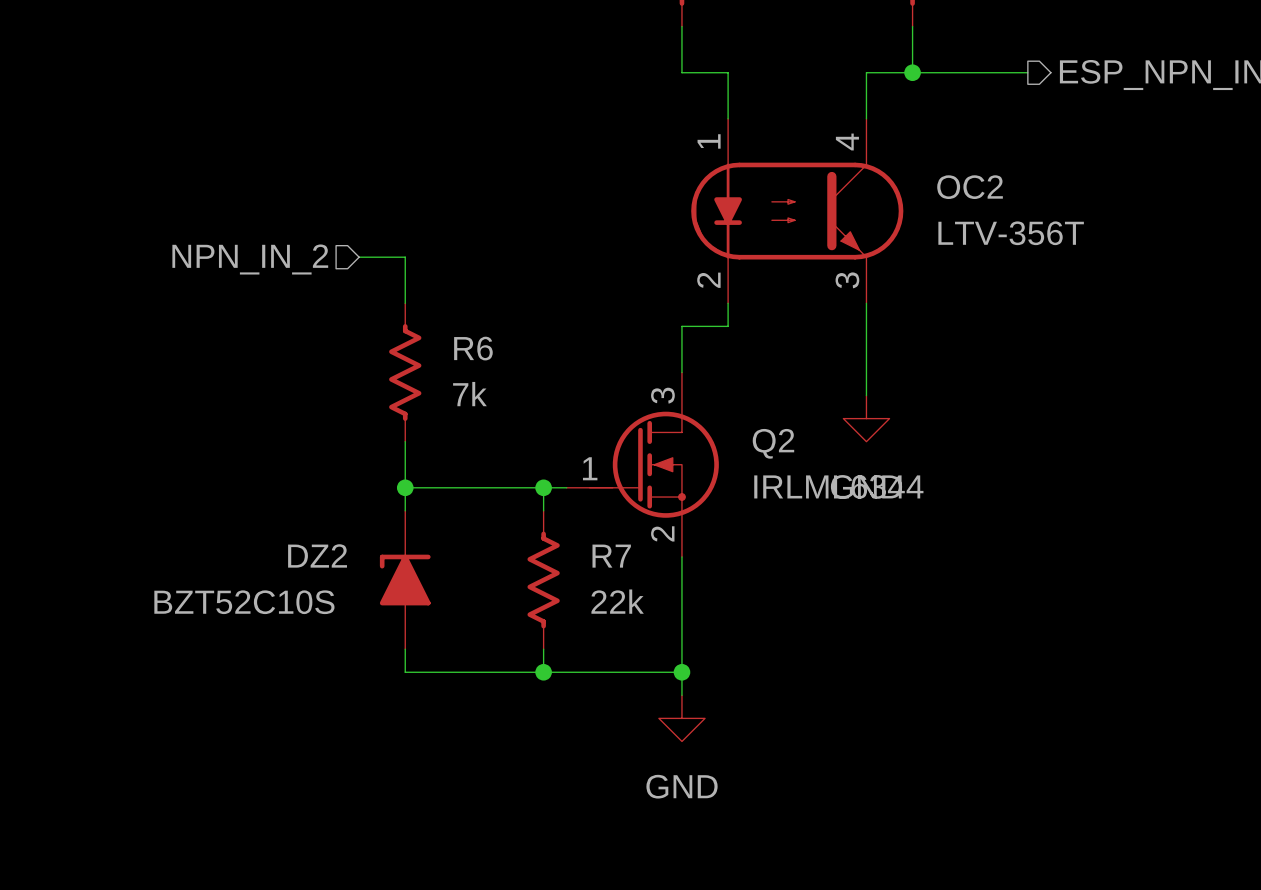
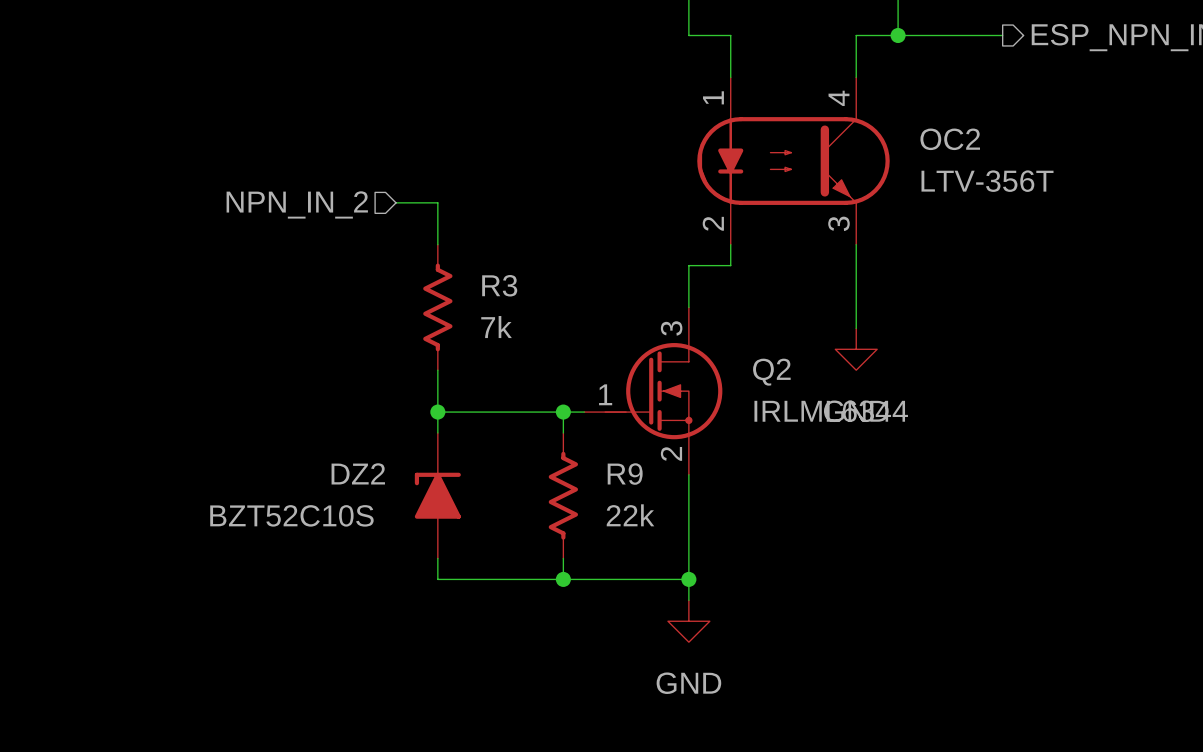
R6 name: R6 (473, 348) -> R3 (499, 285)
R7 name: R7 (611, 556) -> R9 (625, 474)

